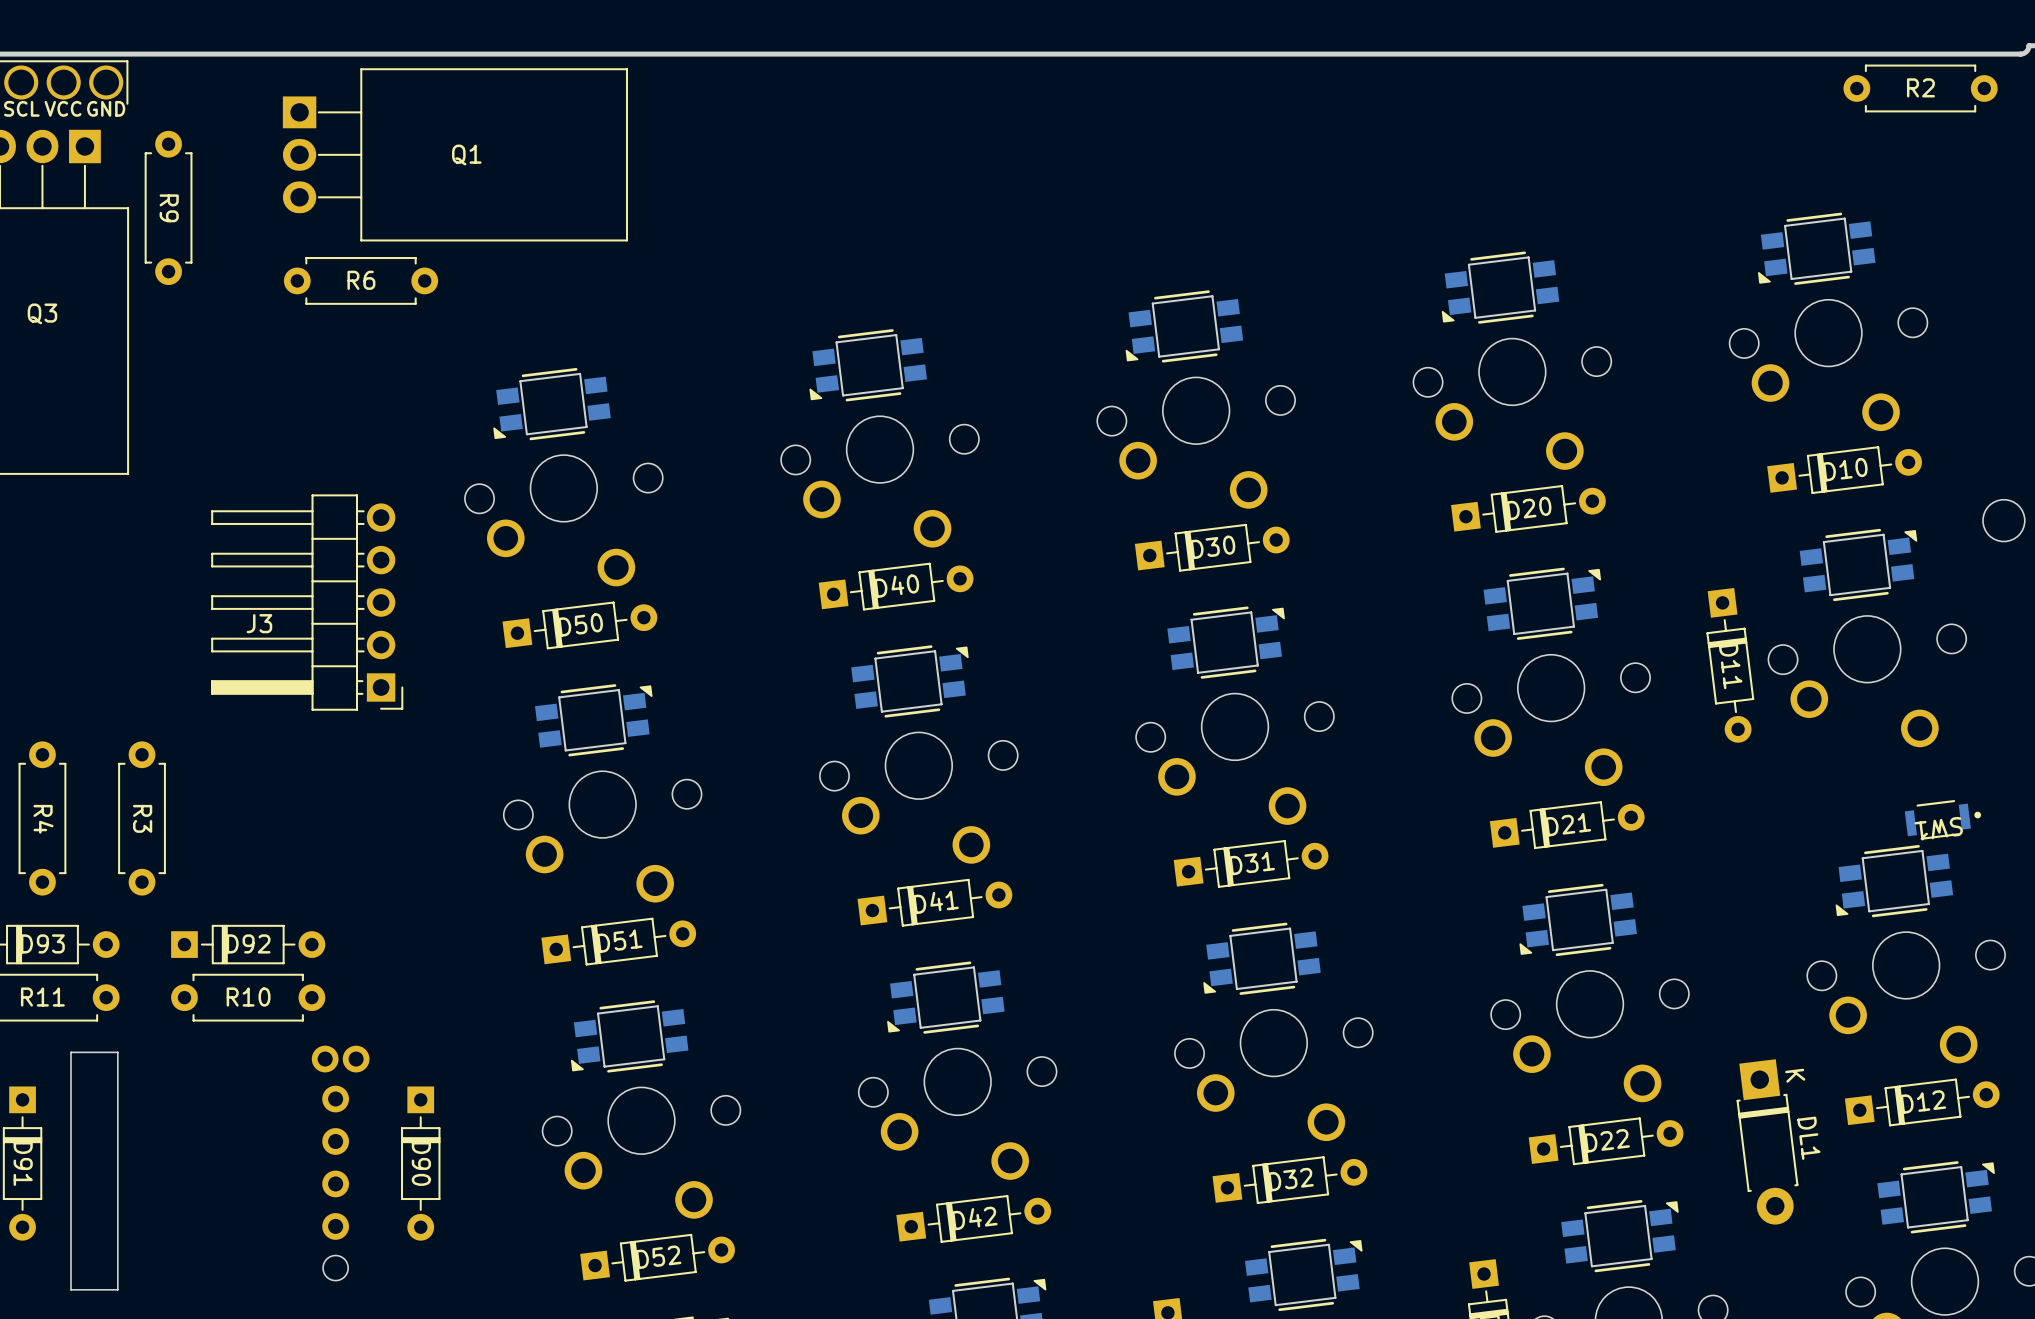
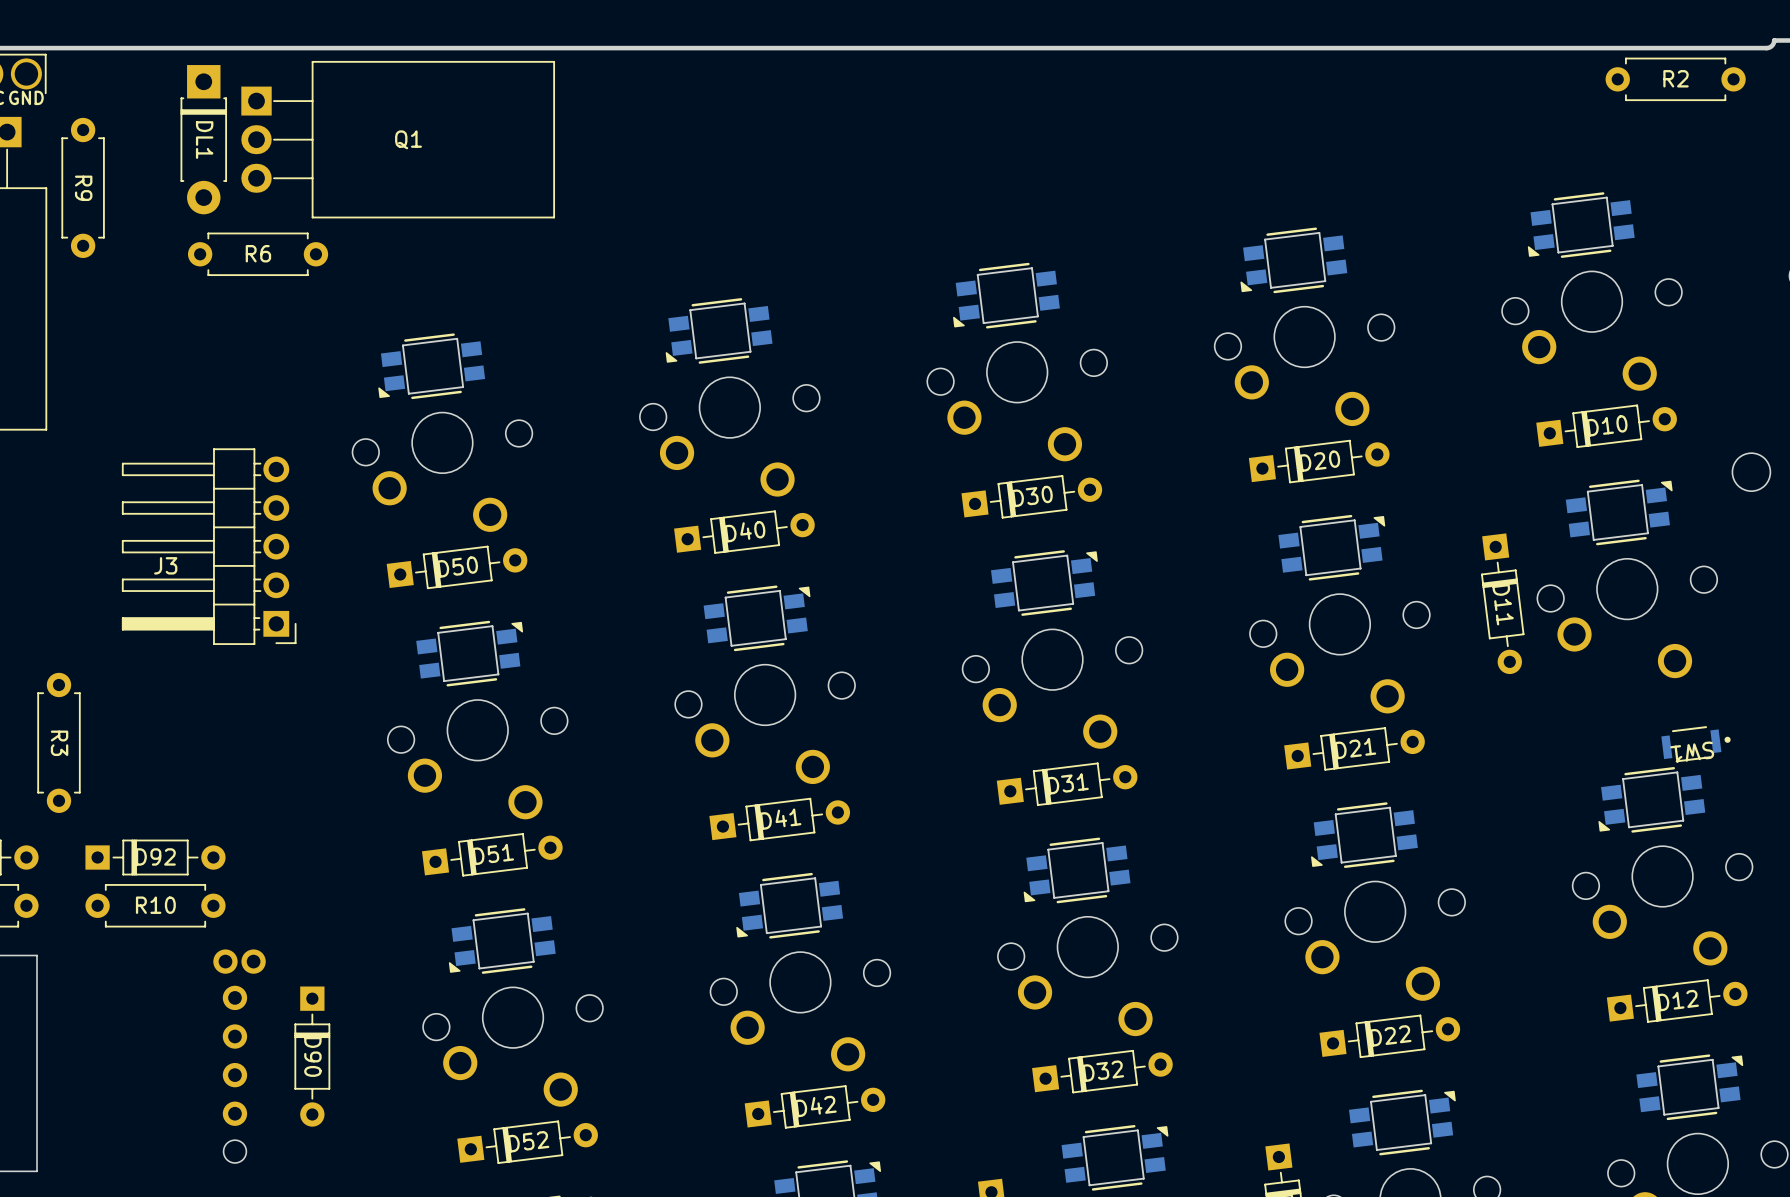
Q1 position: (455, 154) -> (398, 139)
DL1 footprint: [1736, 1059, 1799, 1225] -> [180, 65, 228, 215]
DL1 name position: DL1 (1808, 1138) -> DL1 (204, 140)

